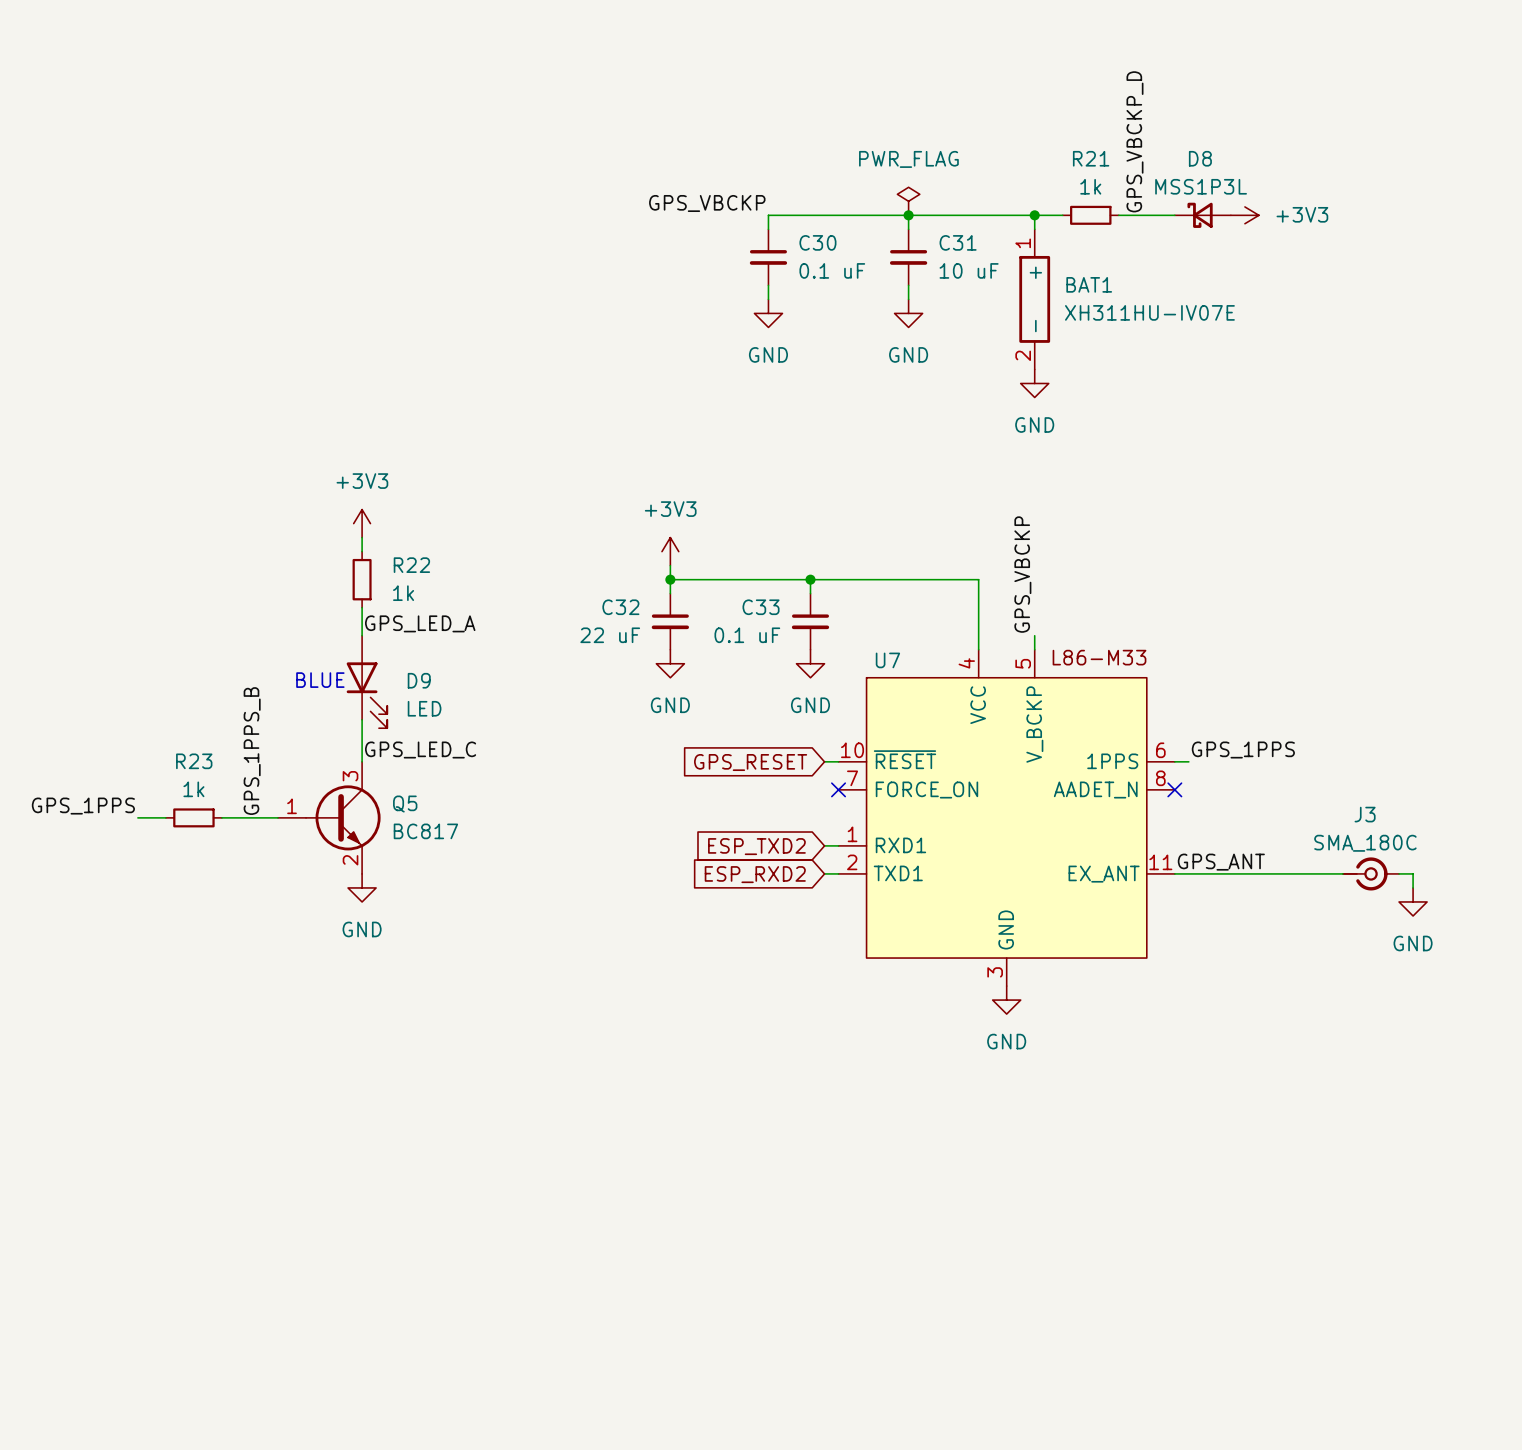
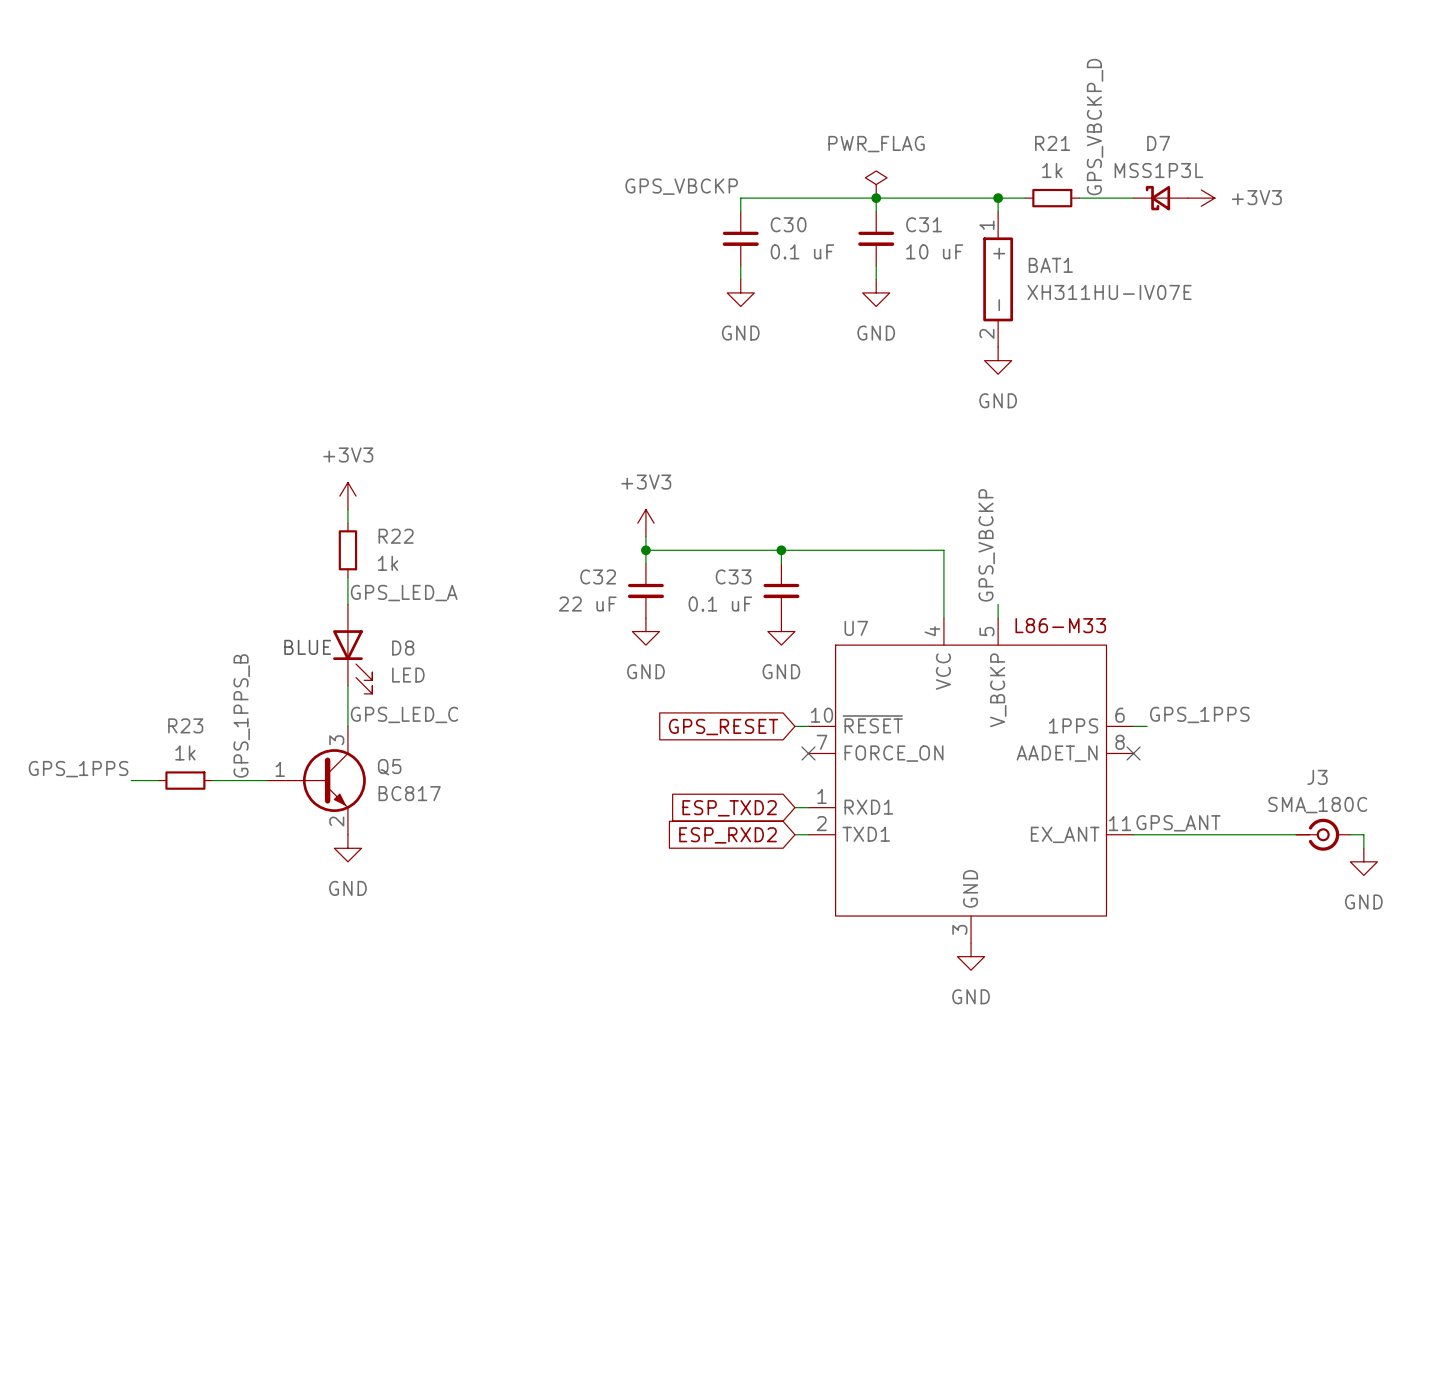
D8 name: D8 (1200, 158) -> D7 (1158, 143)
D9 name: D9 (419, 680) -> D8 (403, 647)

